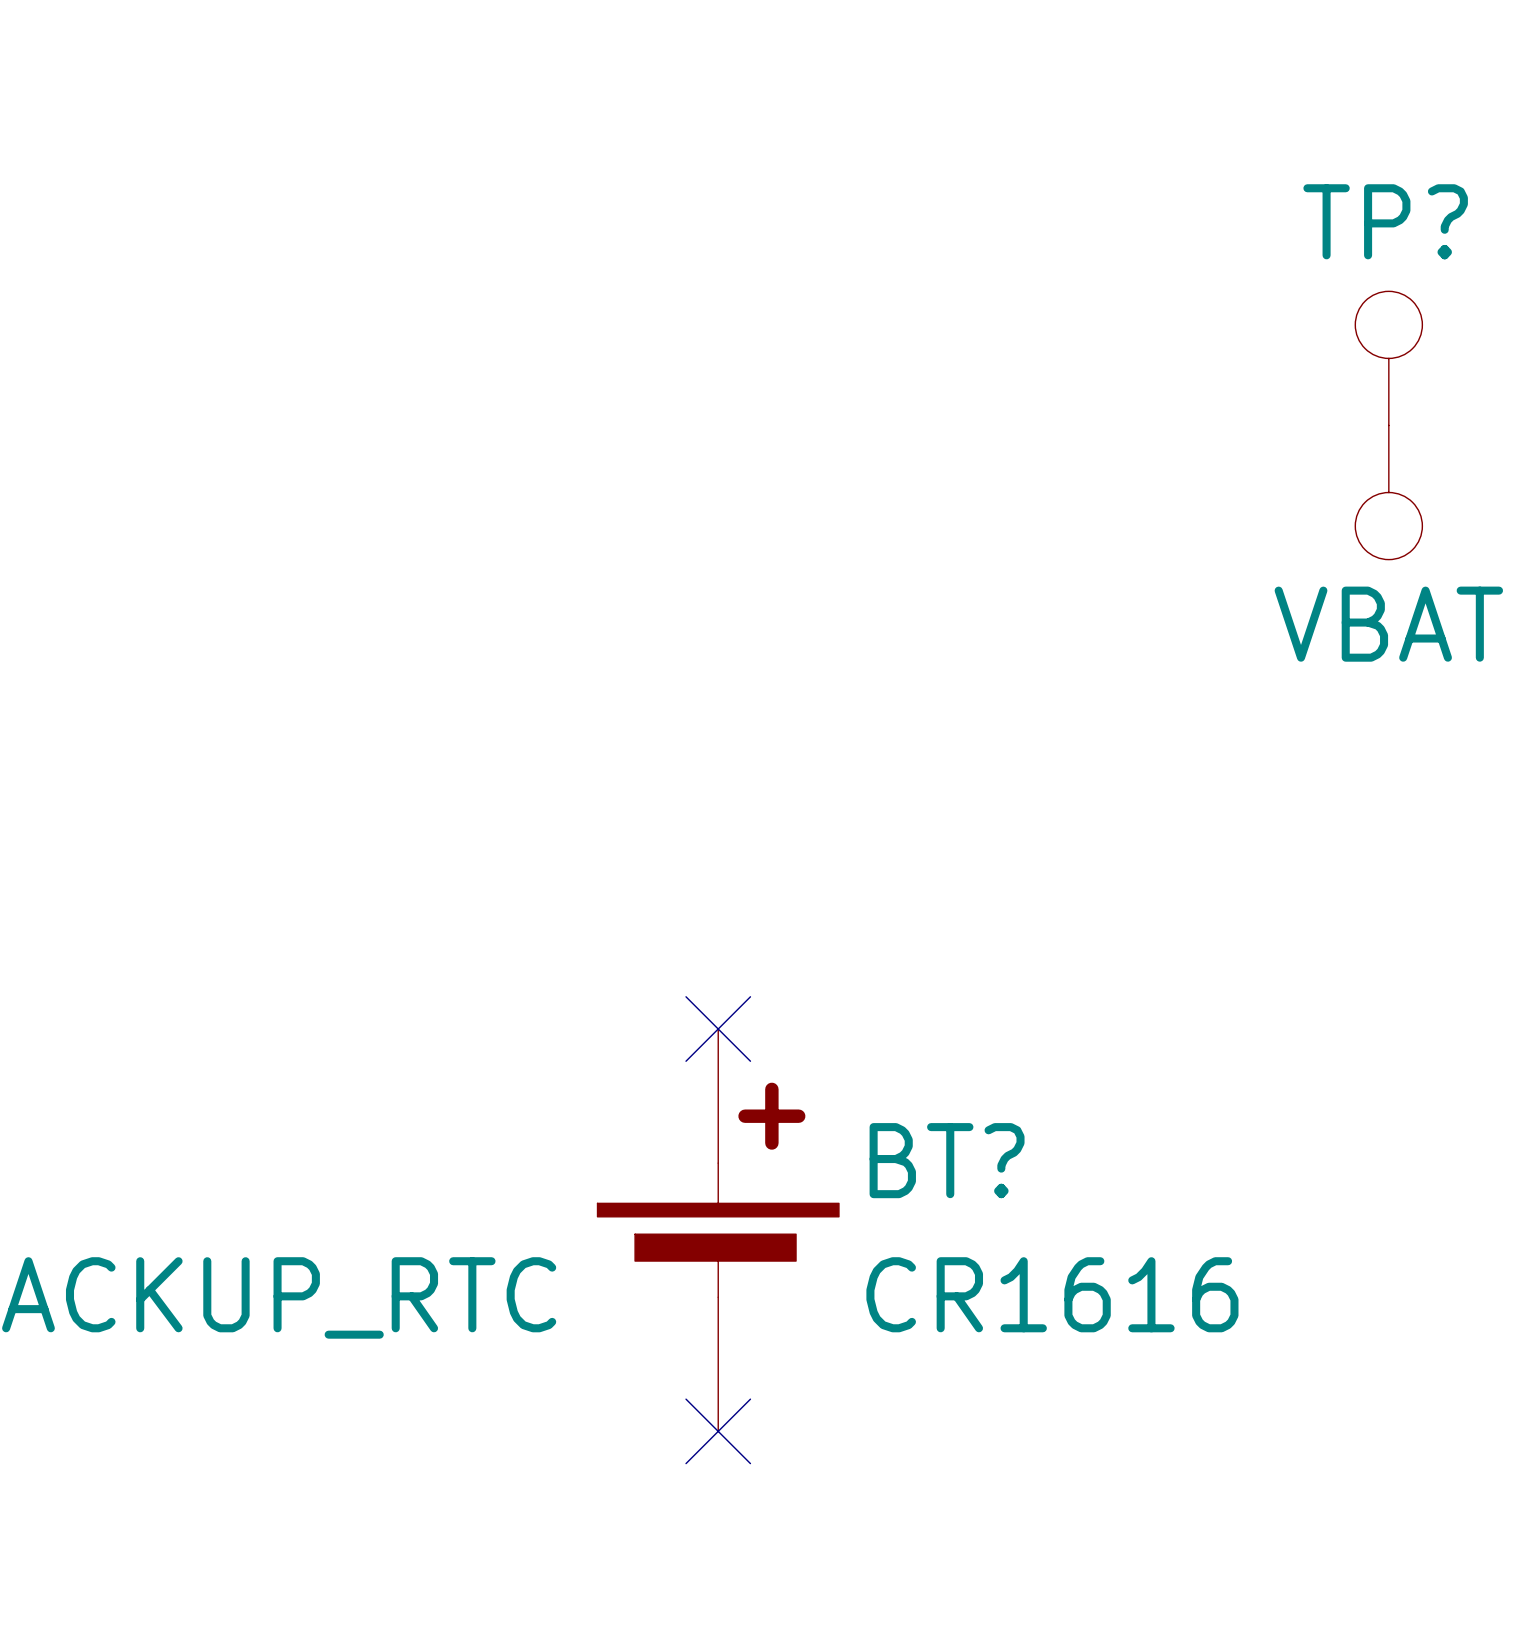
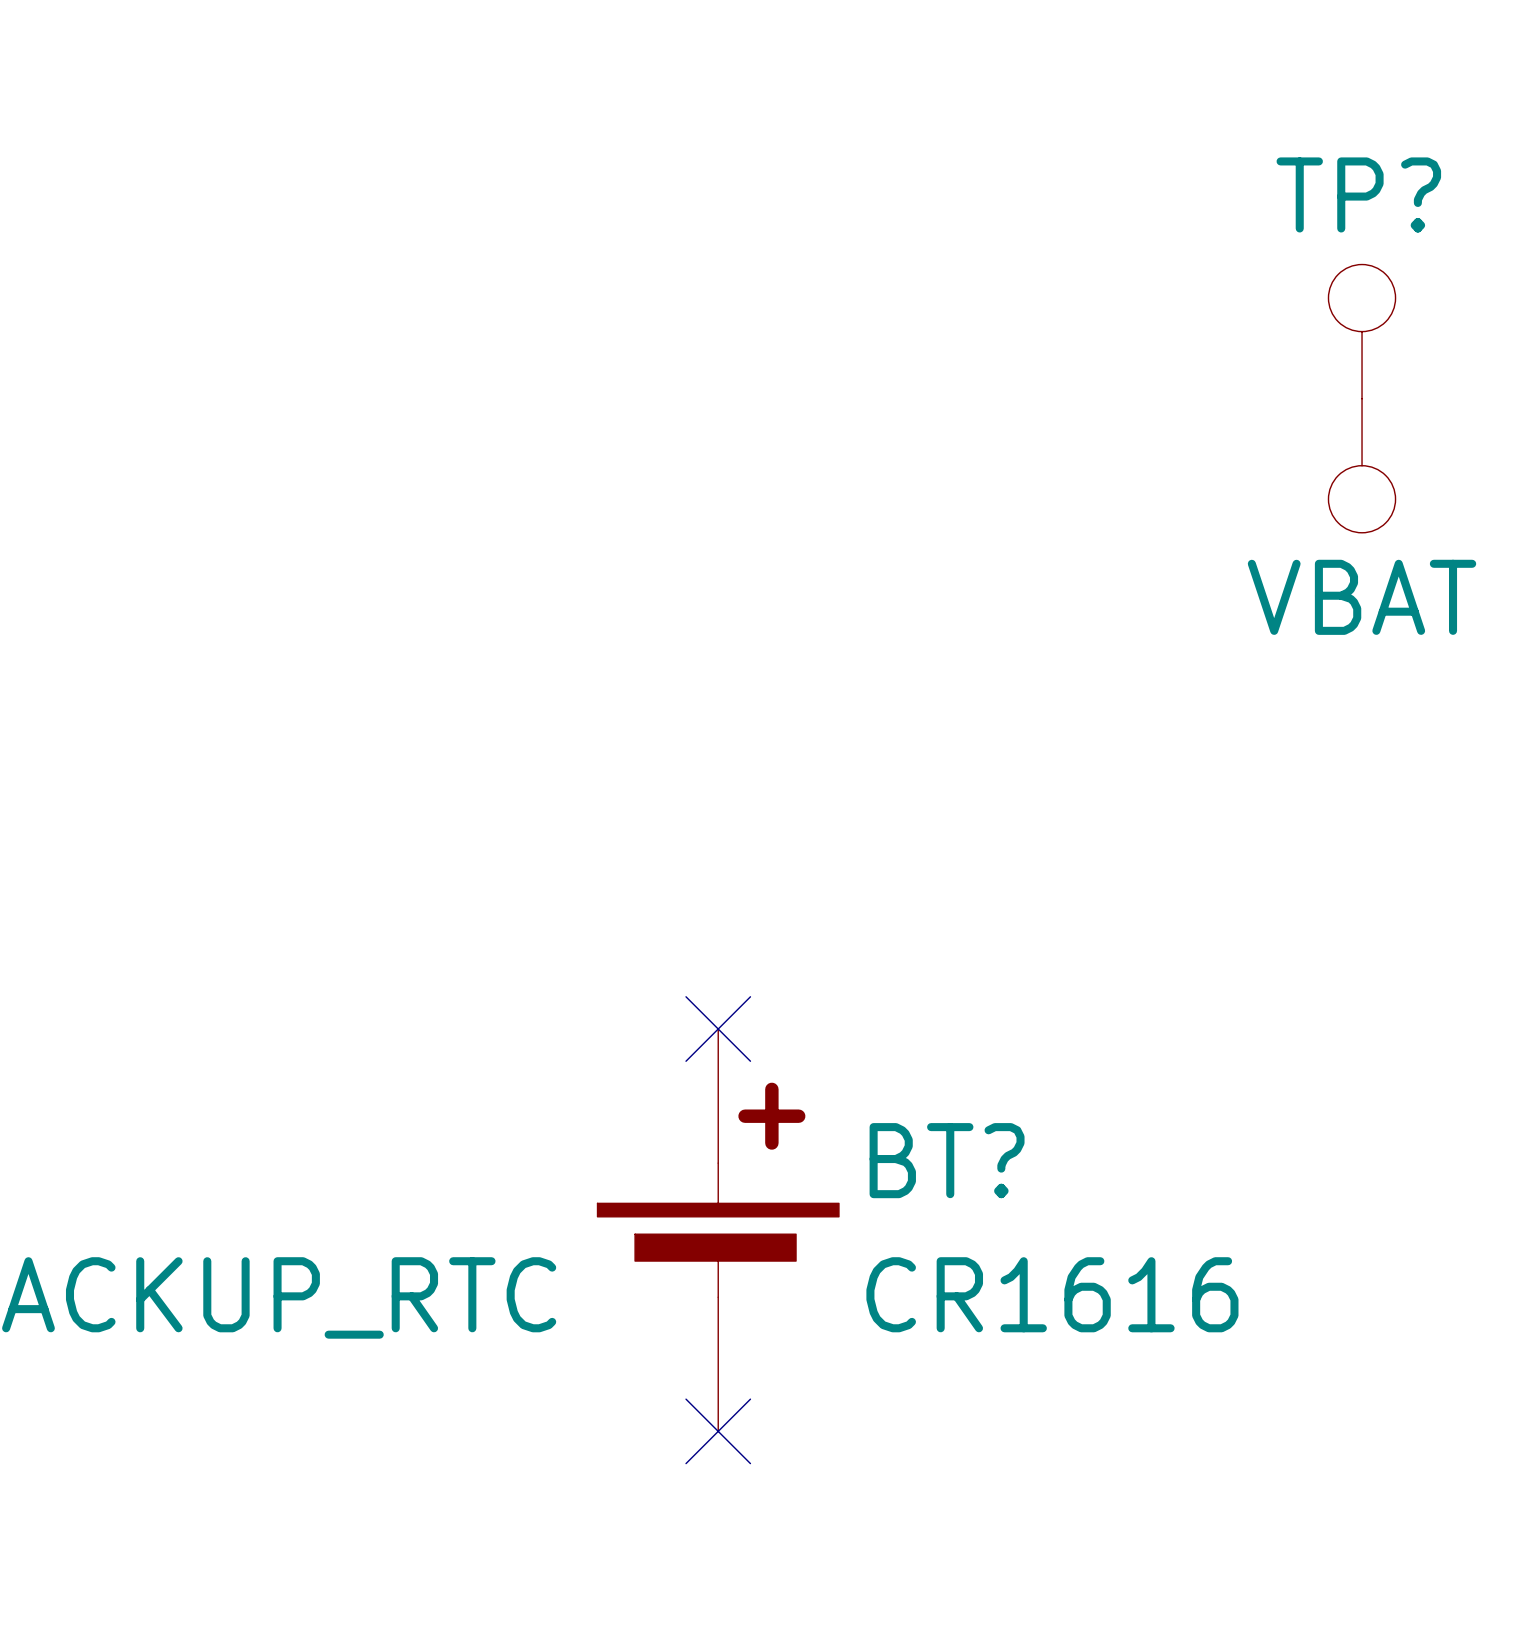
TP? position: (1388, 358) -> (1362, 331)
power symbol position: VBAT (1388, 492) -> VBAT (1362, 465)

